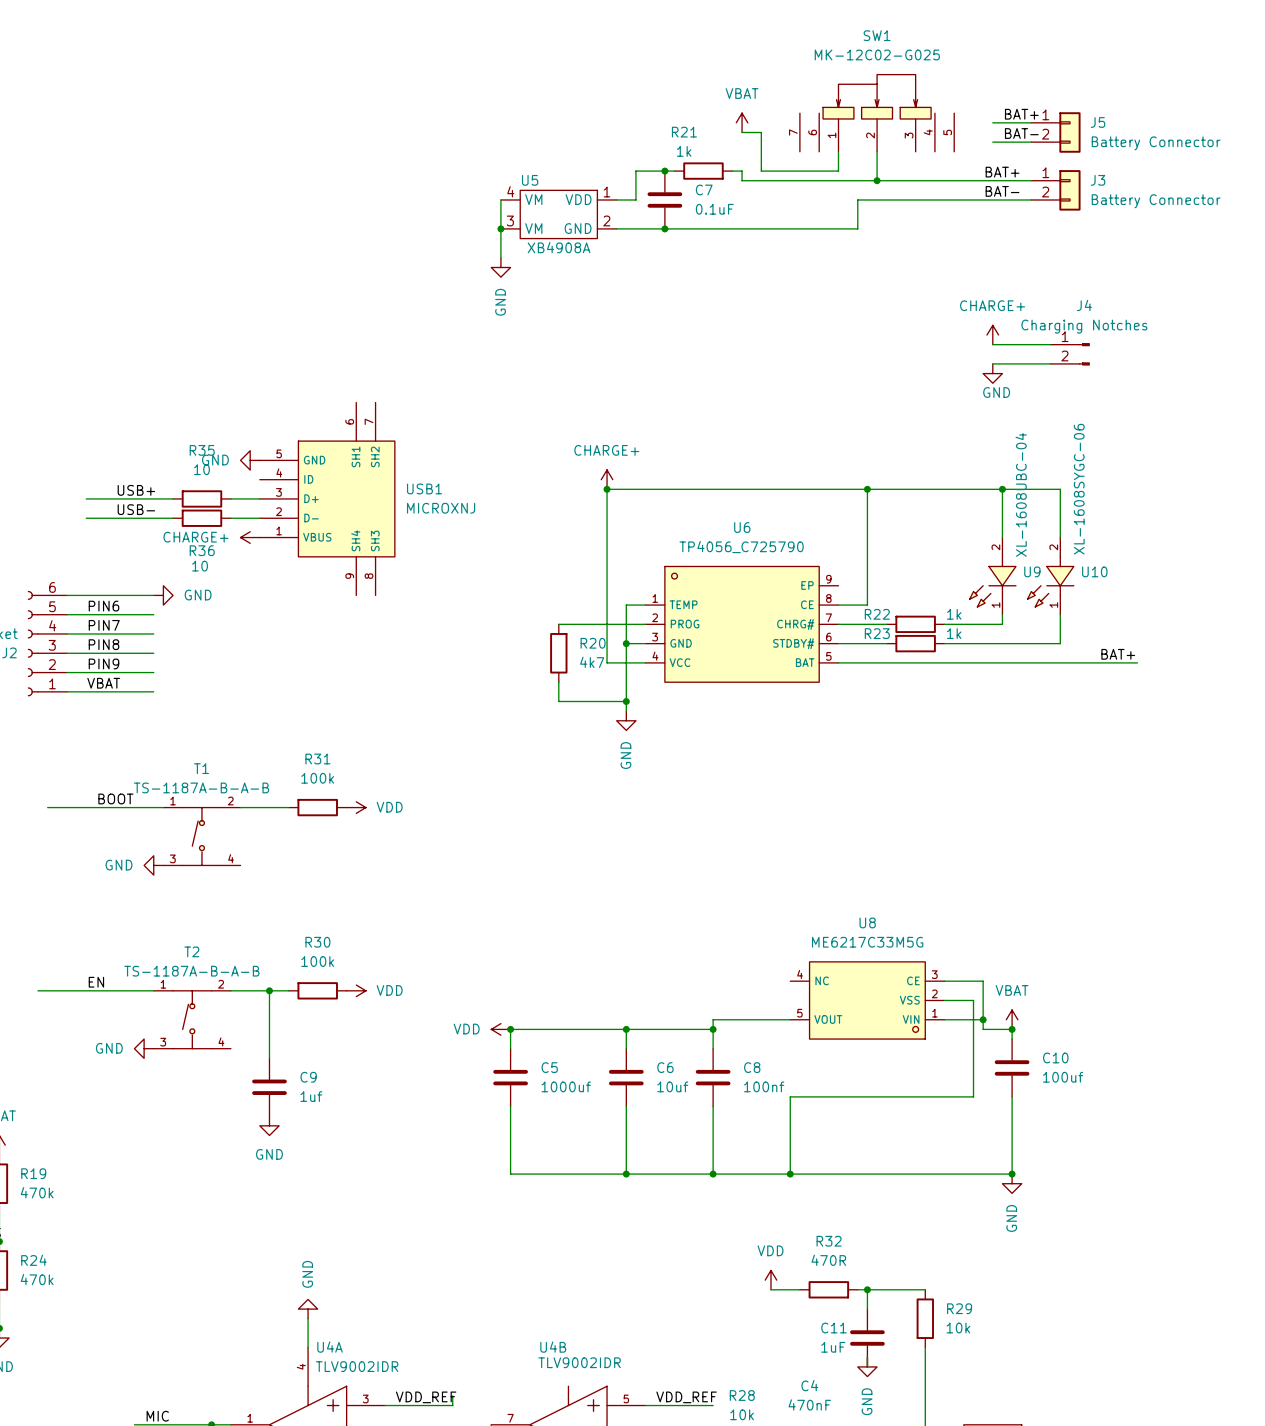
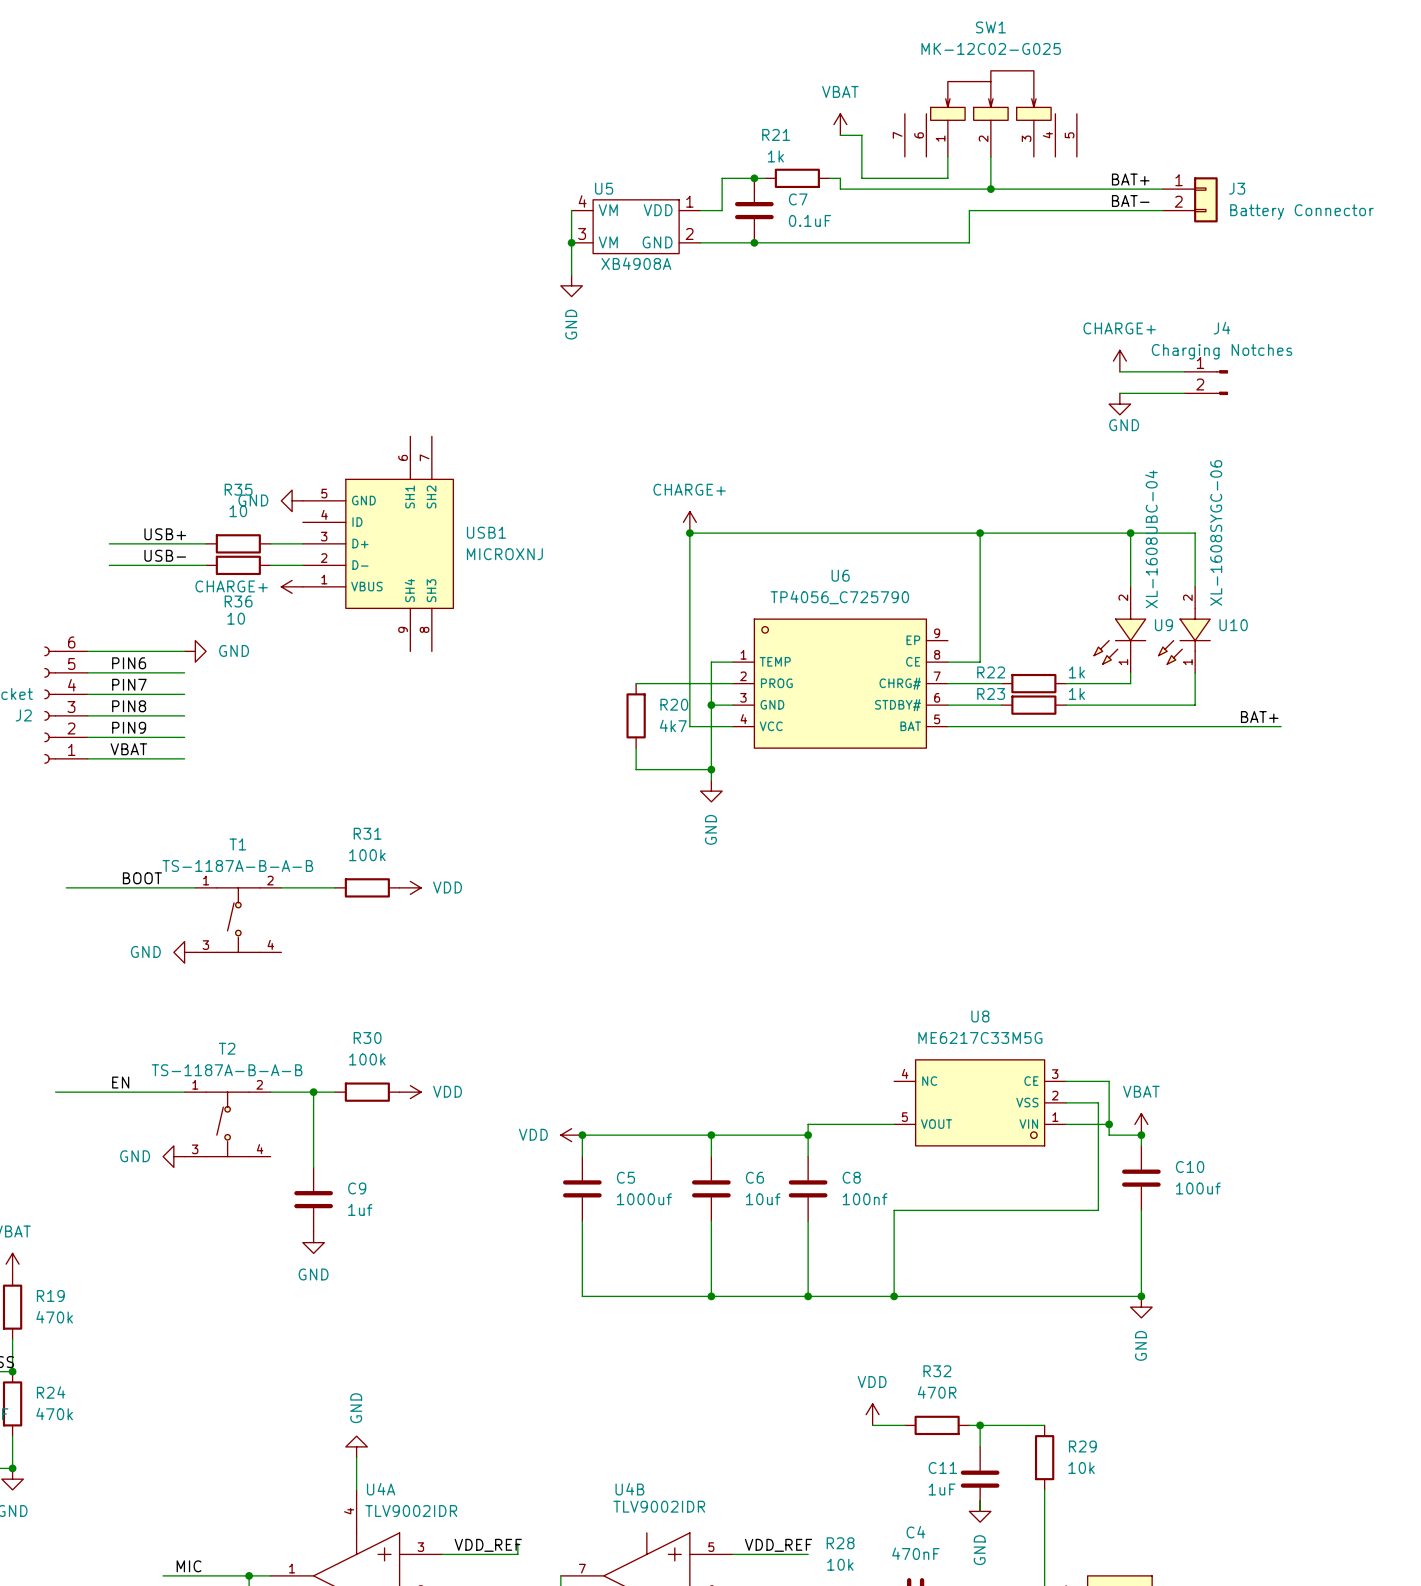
label: BAT+ (1021, 114) -> none
wire: (992, 122) (1031, 122) -> none
J5: Battery Connector (1055, 132) -> none
label: BAT- (1021, 133) -> none
wire: (992, 142) (1031, 142) -> none

